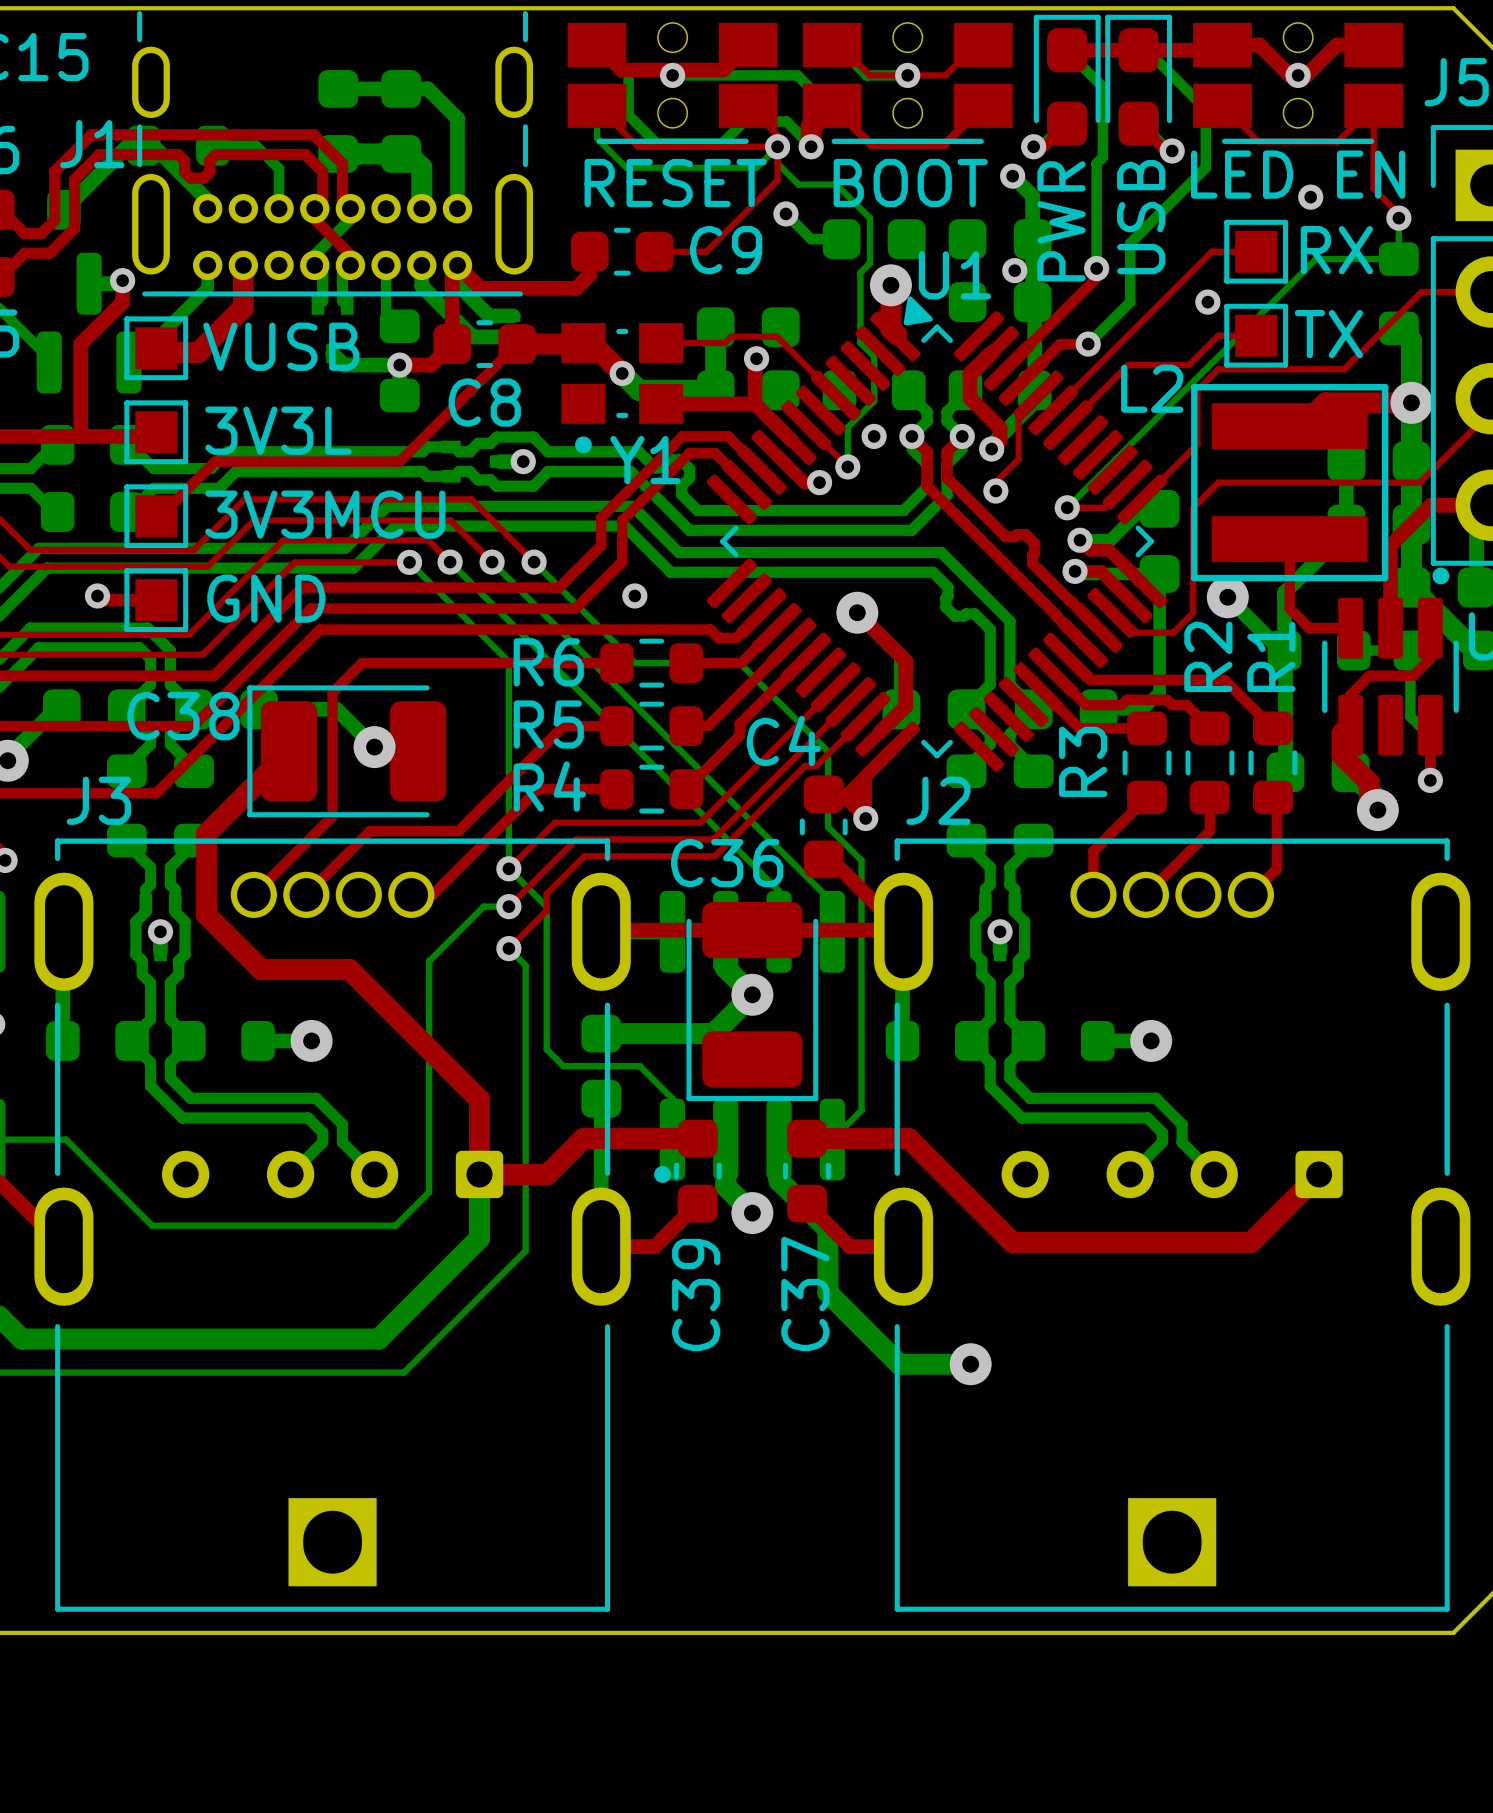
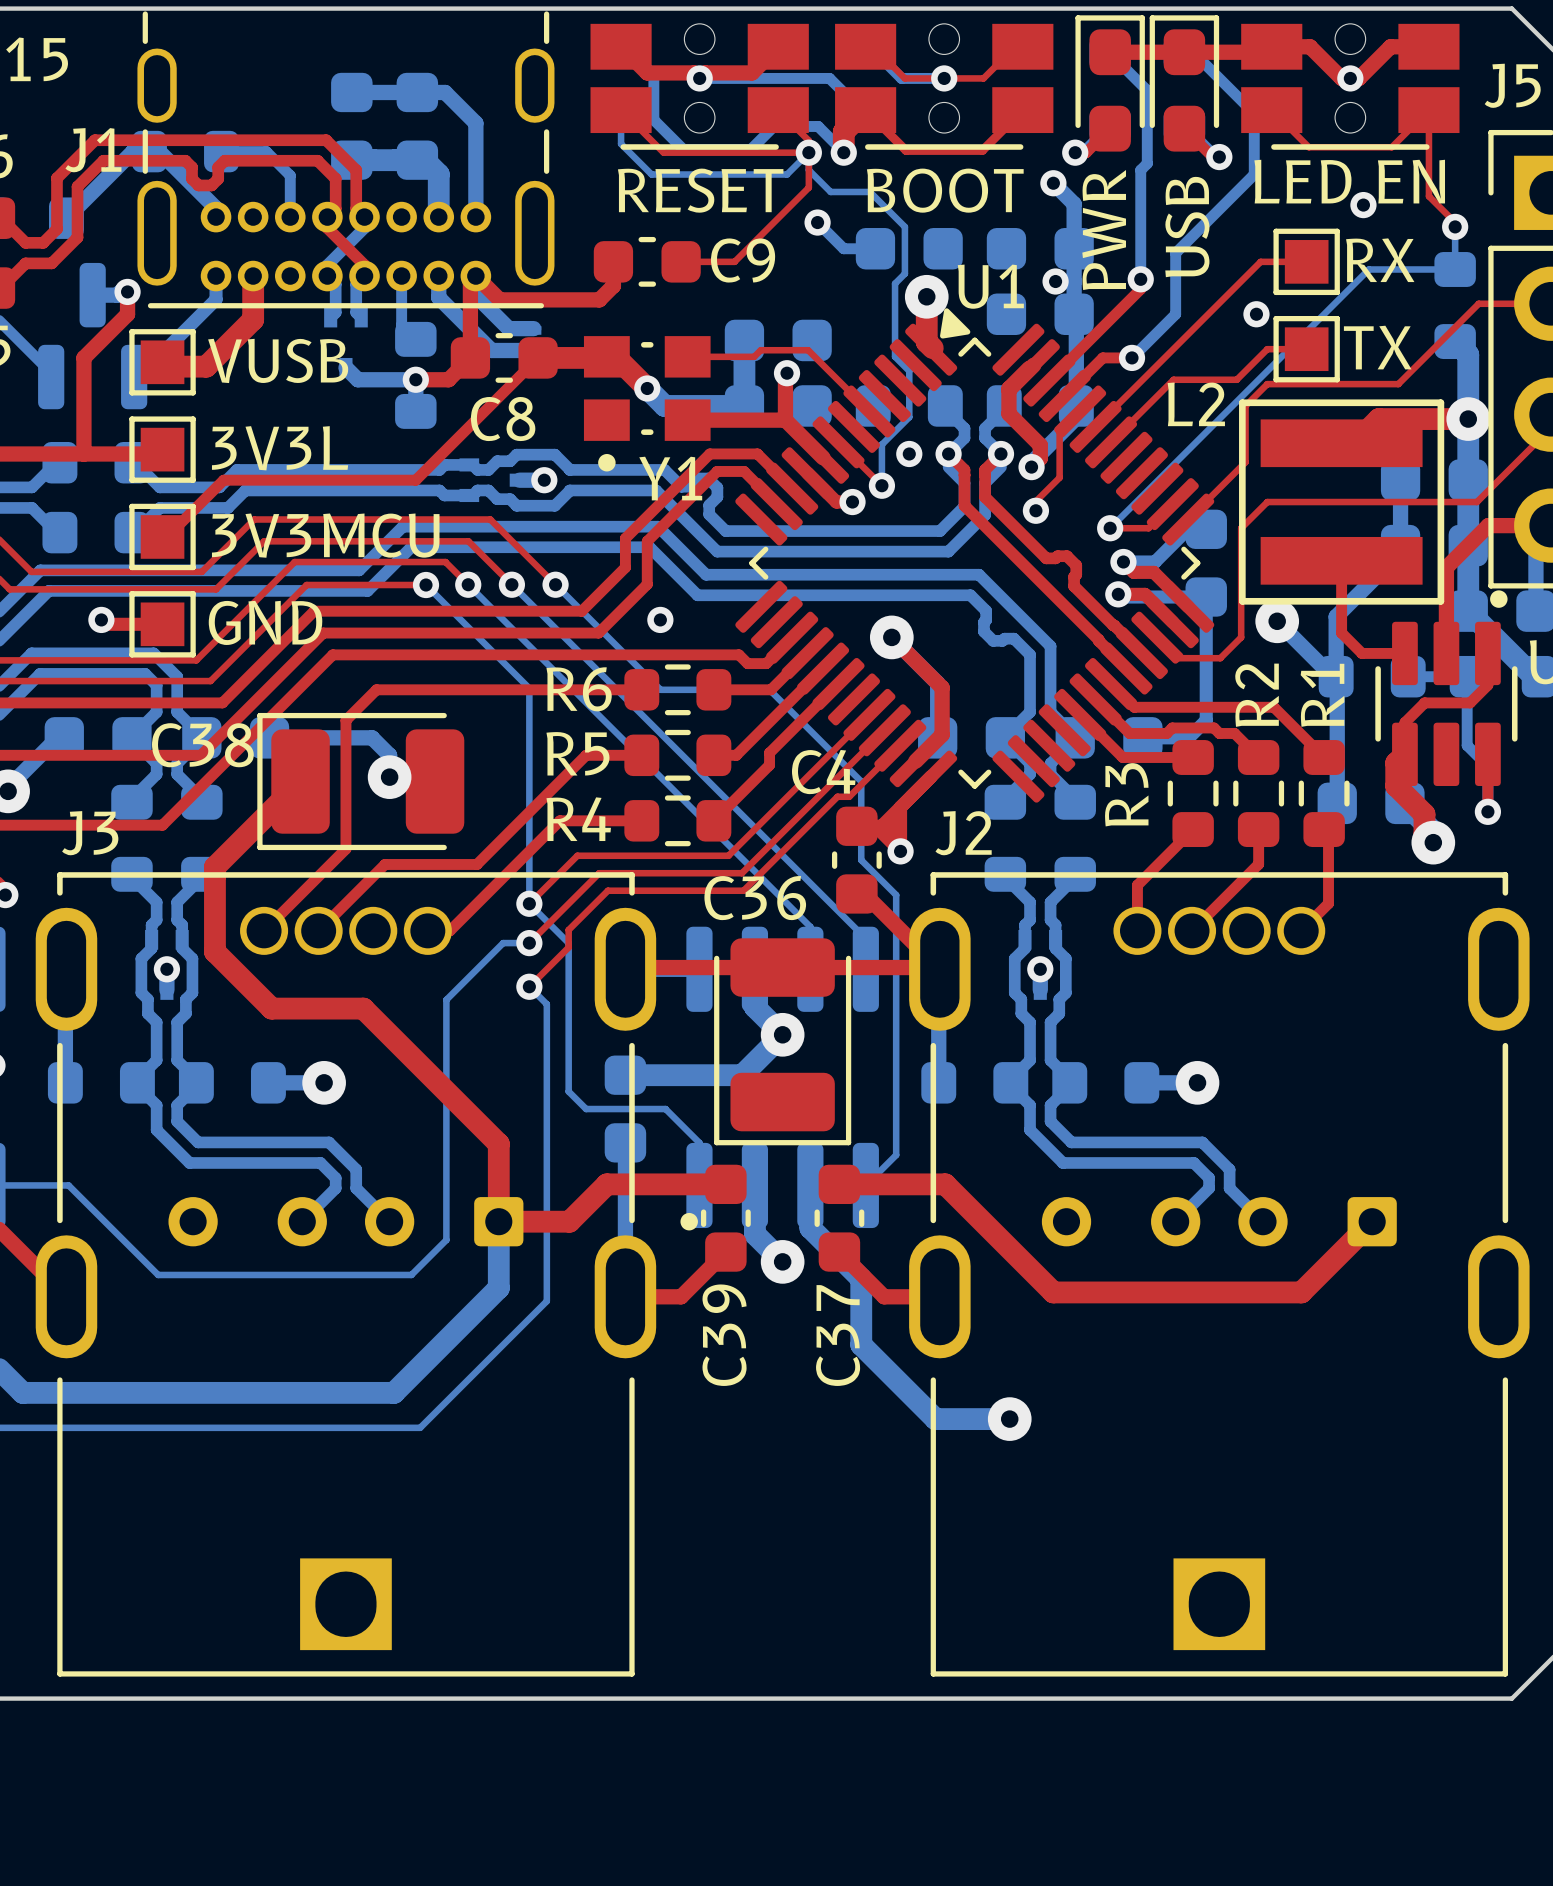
bottom track: (336, 709) (374, 747) -> (350, 737) (372, 737) (389, 755) (389, 790)

